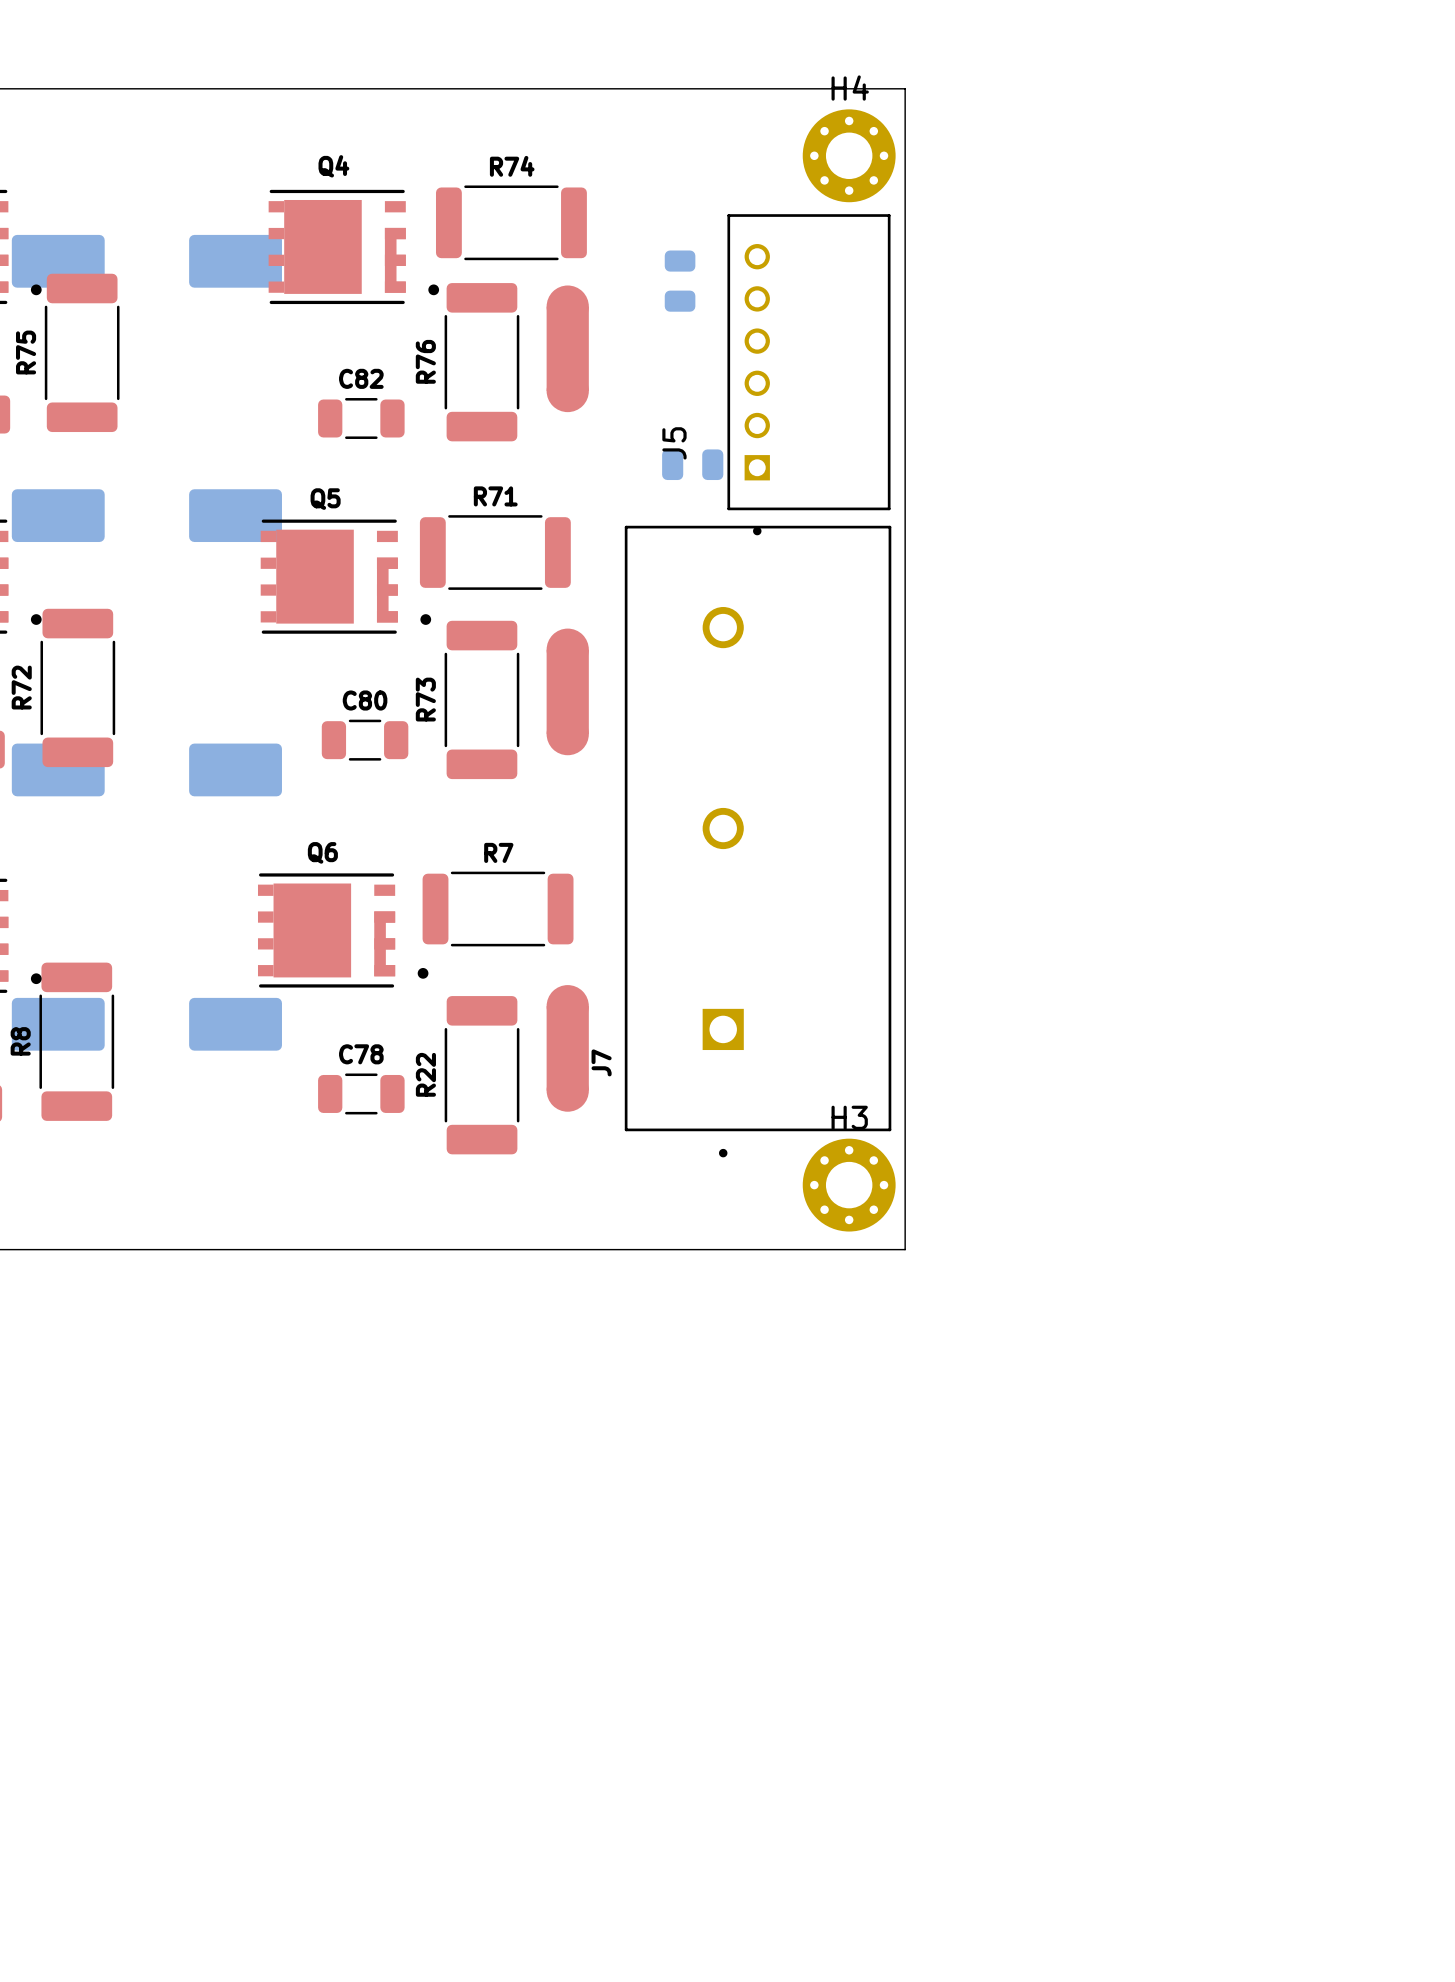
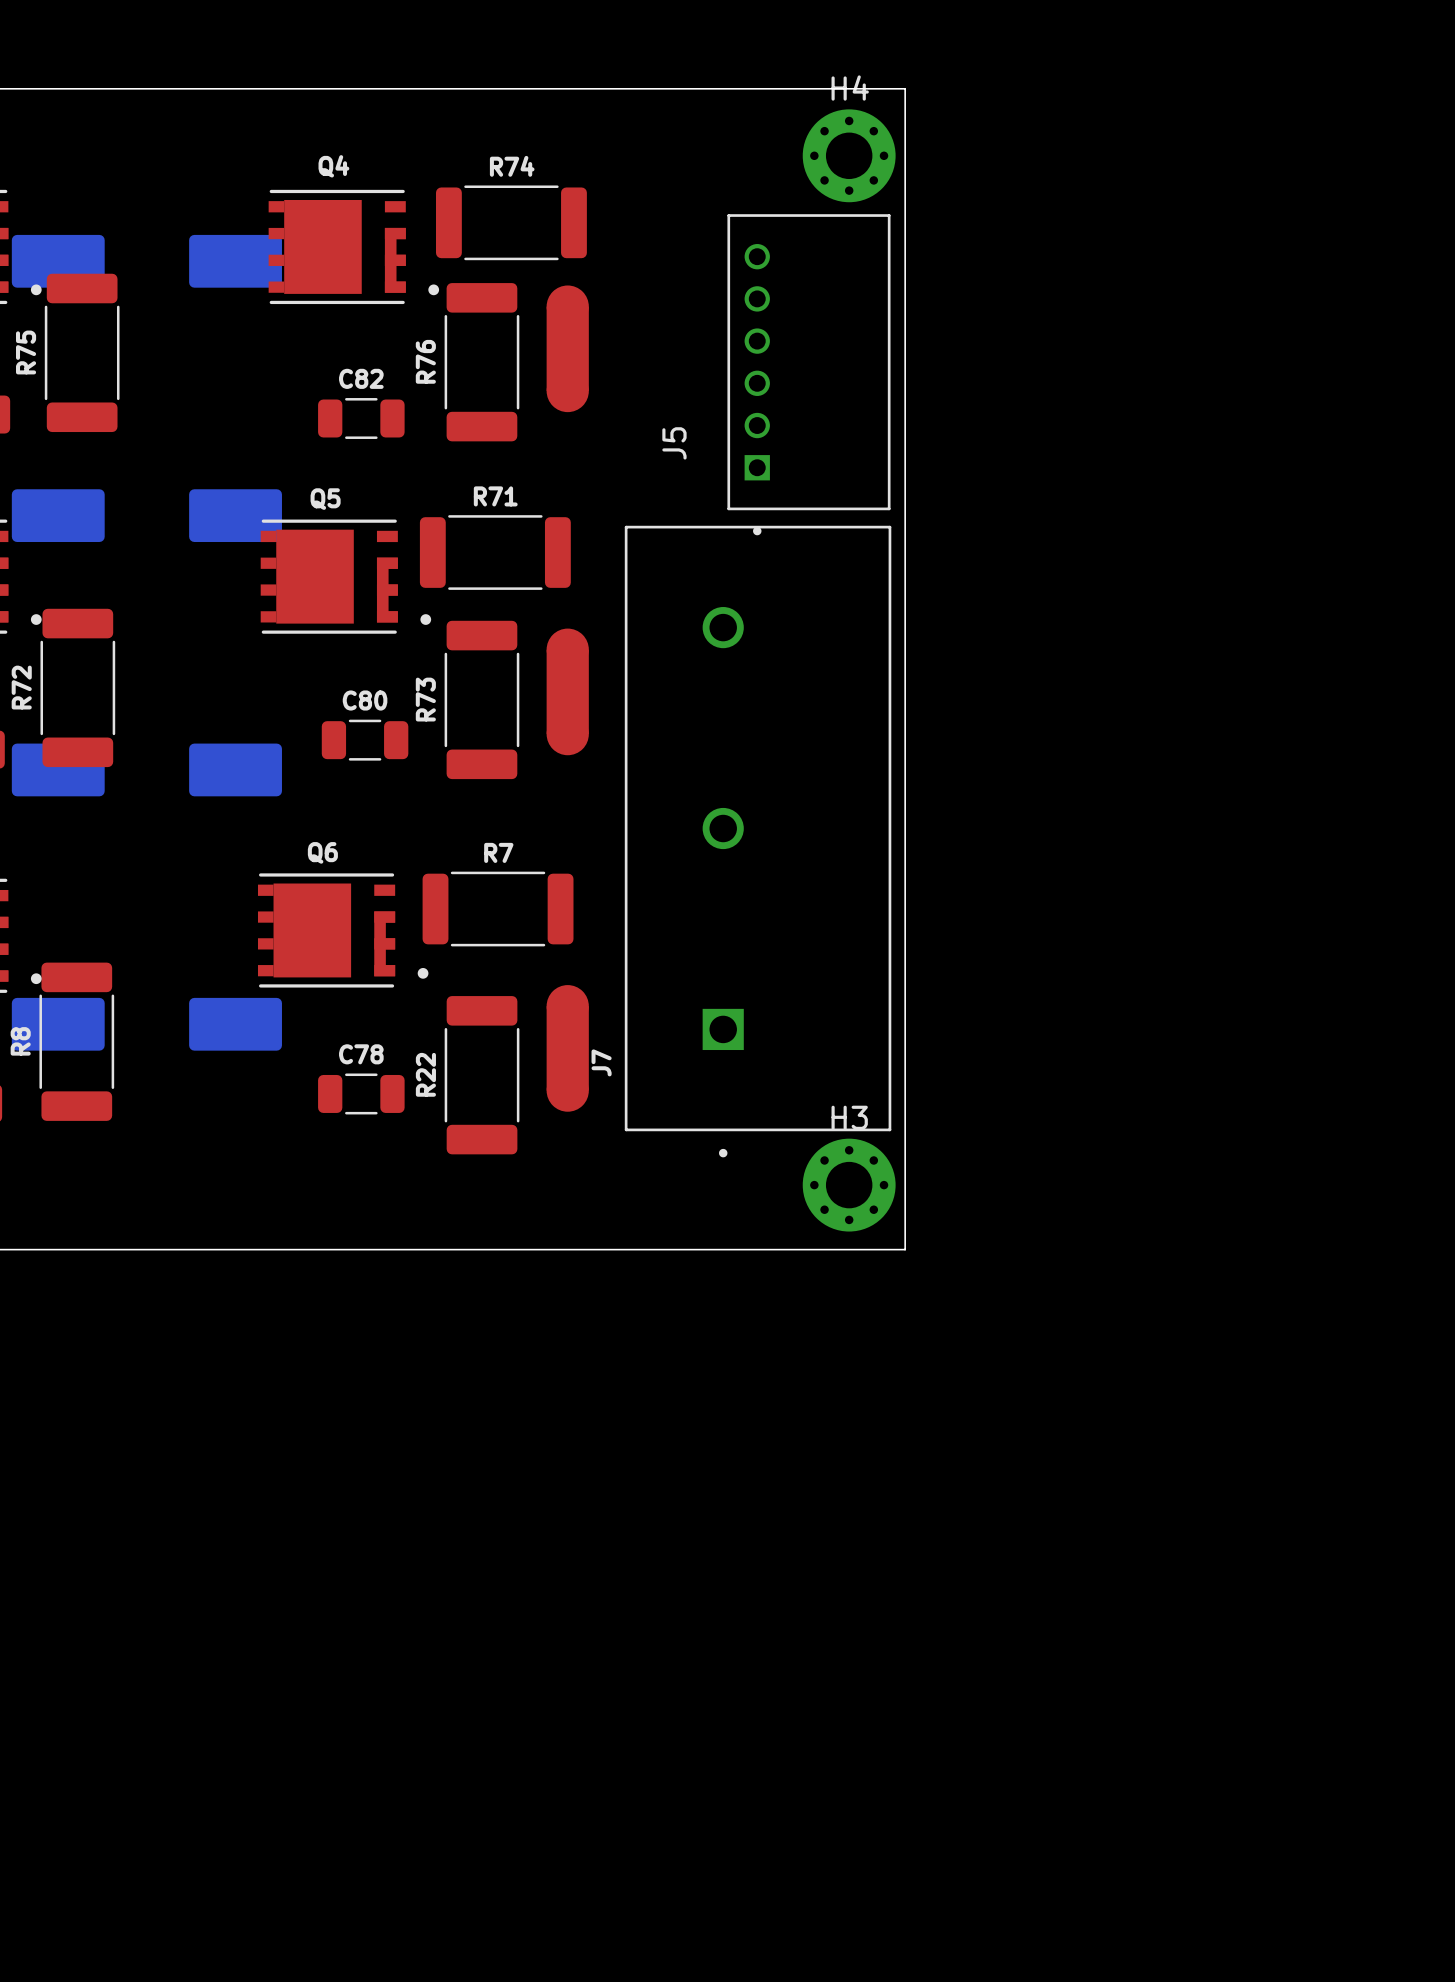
part: (680, 281) -> none
part: (692, 464) -> none

